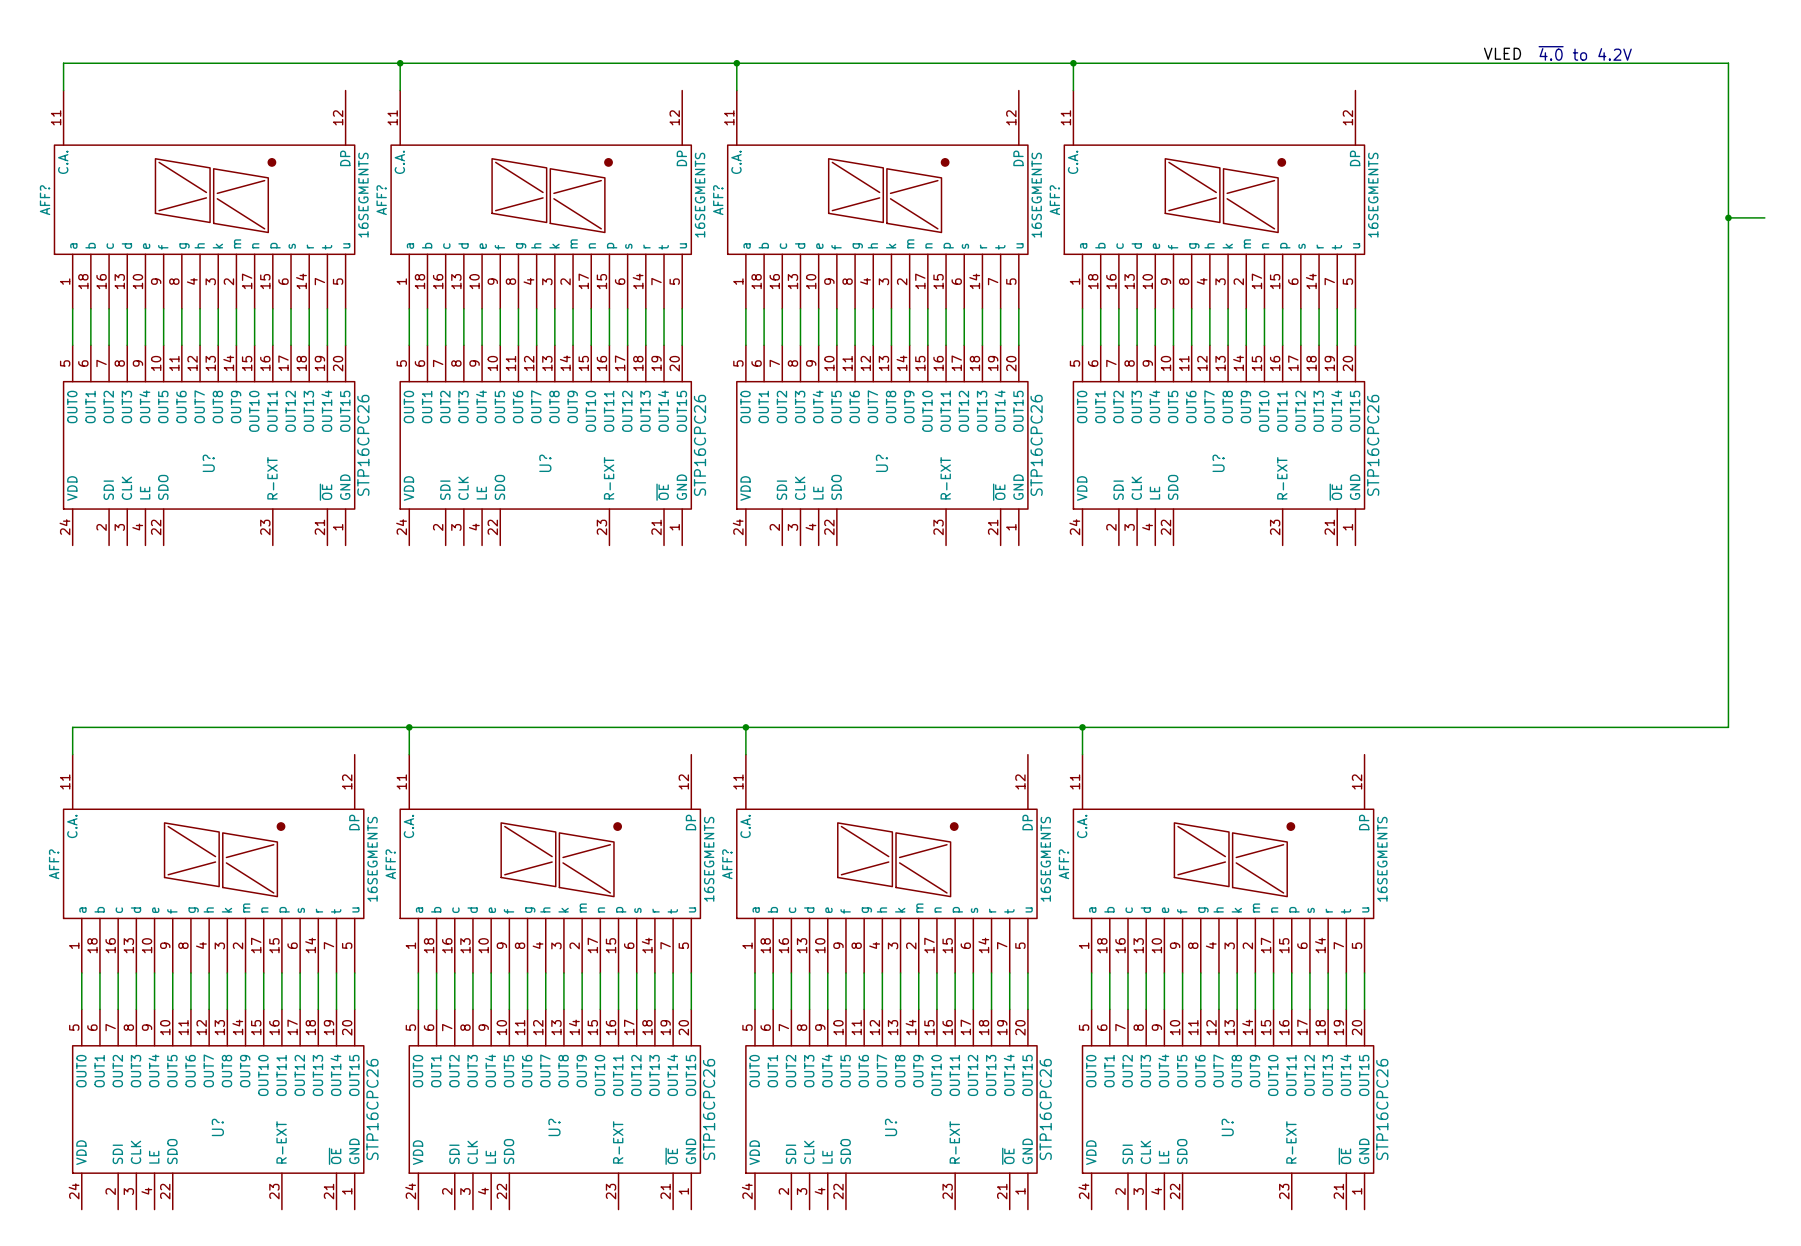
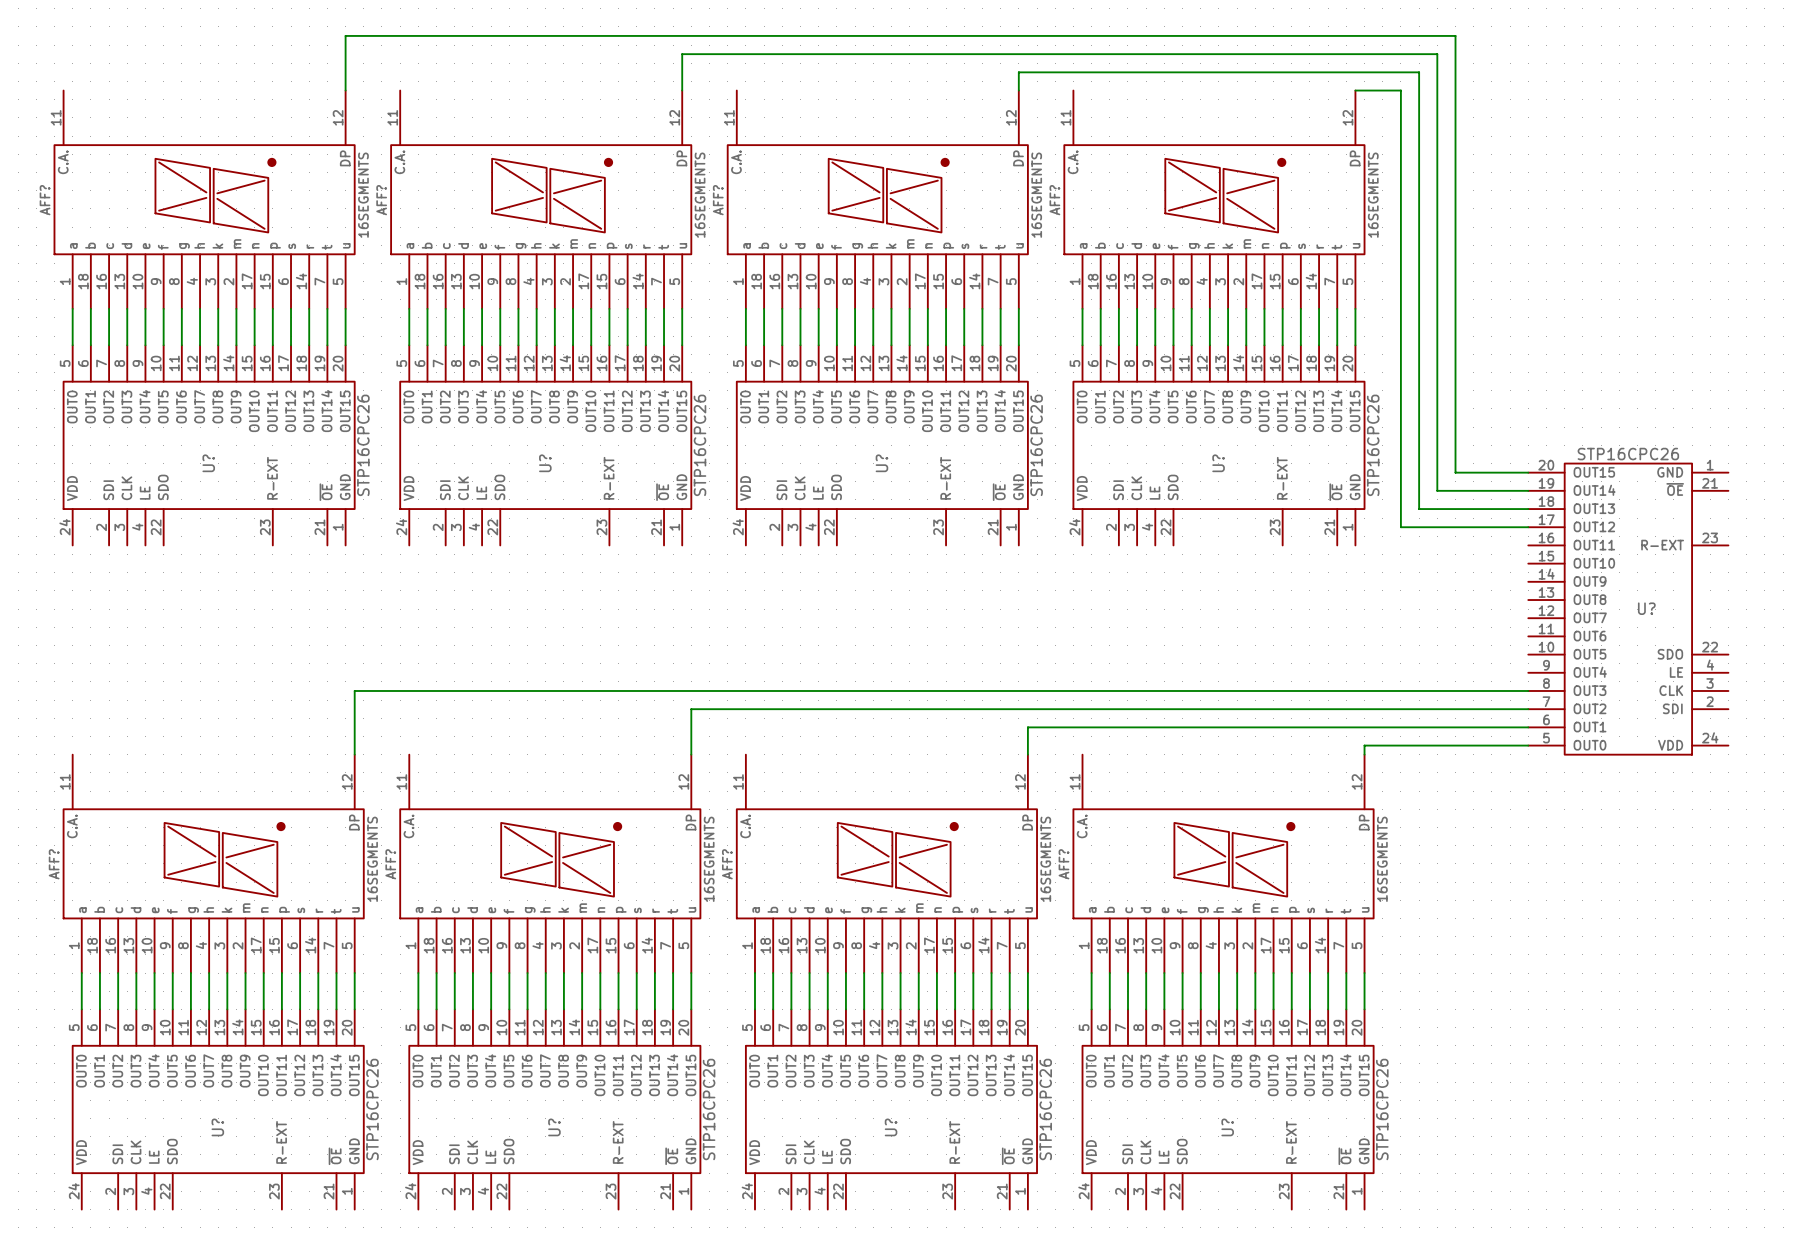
label: VLED (1502, 53) -> none
text: ~{4.0} to 4.2V (1585, 53) -> none
wire: (400, 63) (400, 90) -> none
junction: (400, 63) -> none
wire: (736, 63) (736, 90) -> none
junction: (736, 63) -> none
wire: (1073, 63) (1073, 90) -> none
junction: (1073, 63) -> none
wire: (63, 90) (63, 63) (1728, 63) (1728, 727) (1528, 727) -> none
wire: none -> (345, 90) (345, 35) (1455, 35) (1455, 472) (1528, 472)
wire: none -> (682, 90) (682, 54) (1437, 54) (1437, 490) (1528, 490)
wire: none -> (1018, 90) (1018, 72) (1419, 72) (1419, 509) (1528, 509)
wire: none -> (1355, 90) (1400, 90) (1400, 527) (1528, 527)
wire: (1728, 217) (1764, 217) -> none
junction: (1728, 217) -> none
U?: none -> STP16CPC26 (1628, 609)
wire: none -> (1528, 690) (354, 690) (354, 754)
wire: none -> (1528, 709) (691, 709) (691, 754)
wire: (409, 727) (409, 754) -> none
junction: (409, 727) -> none
wire: (745, 727) (745, 754) -> none
junction: (745, 727) -> none
wire: (1027, 727) (72, 727) (72, 754) -> (1027, 727) (1027, 754)
wire: (1082, 727) (1082, 754) -> none
junction: (1082, 727) -> none
wire: none -> (1528, 745) (1364, 745) (1364, 754)

